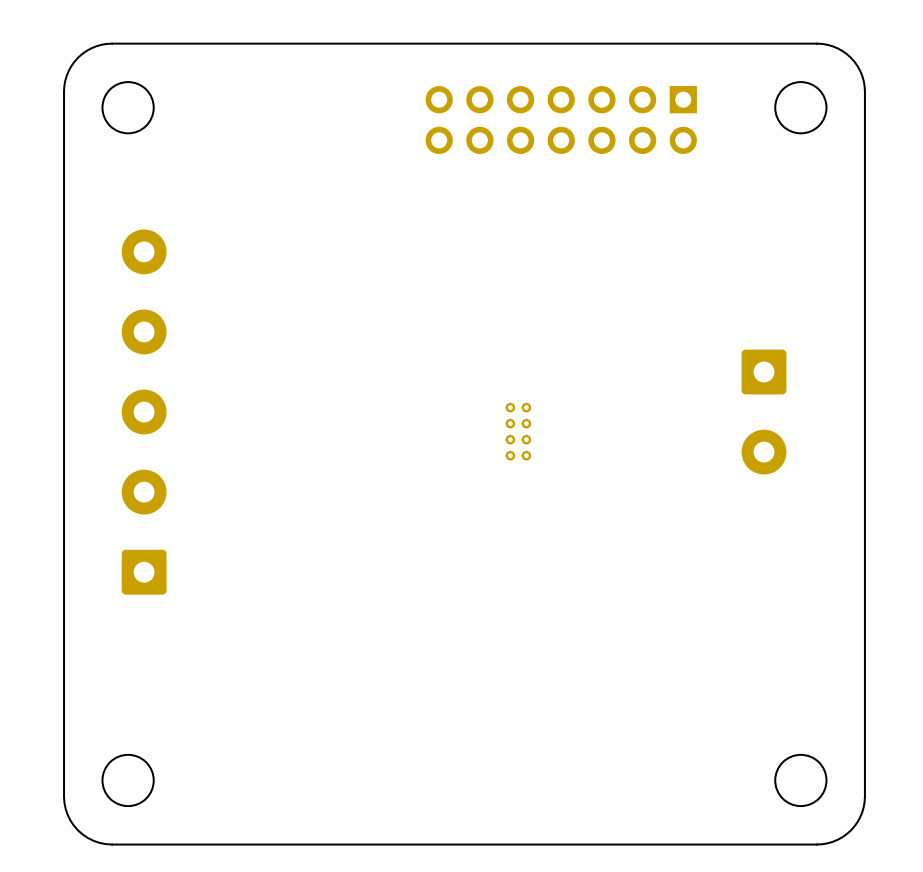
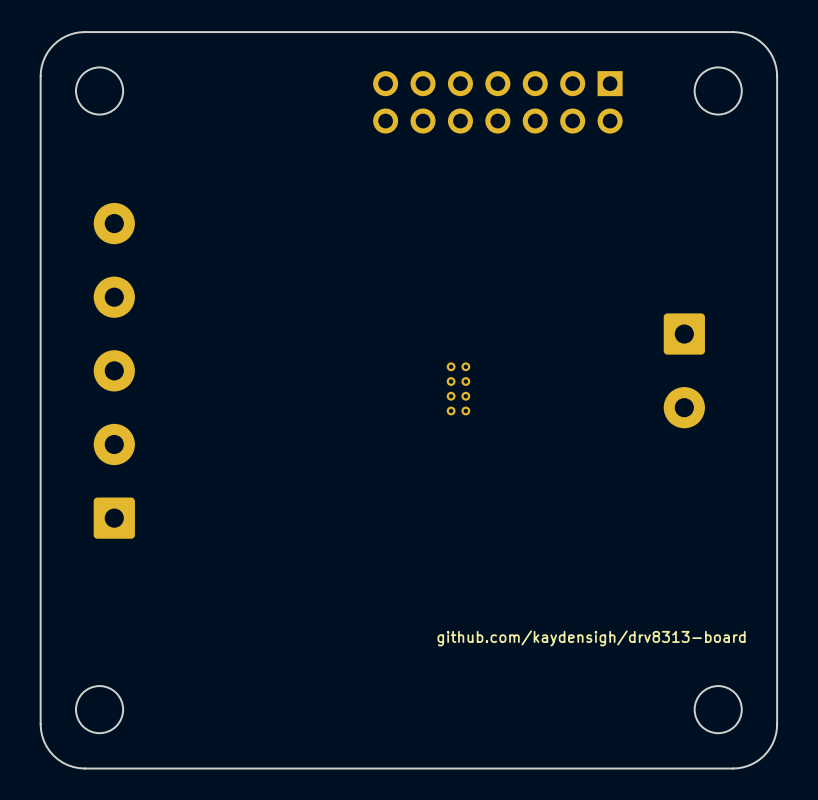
text: none -> github.com/kaydensigh/drv8313-board (591, 638)

